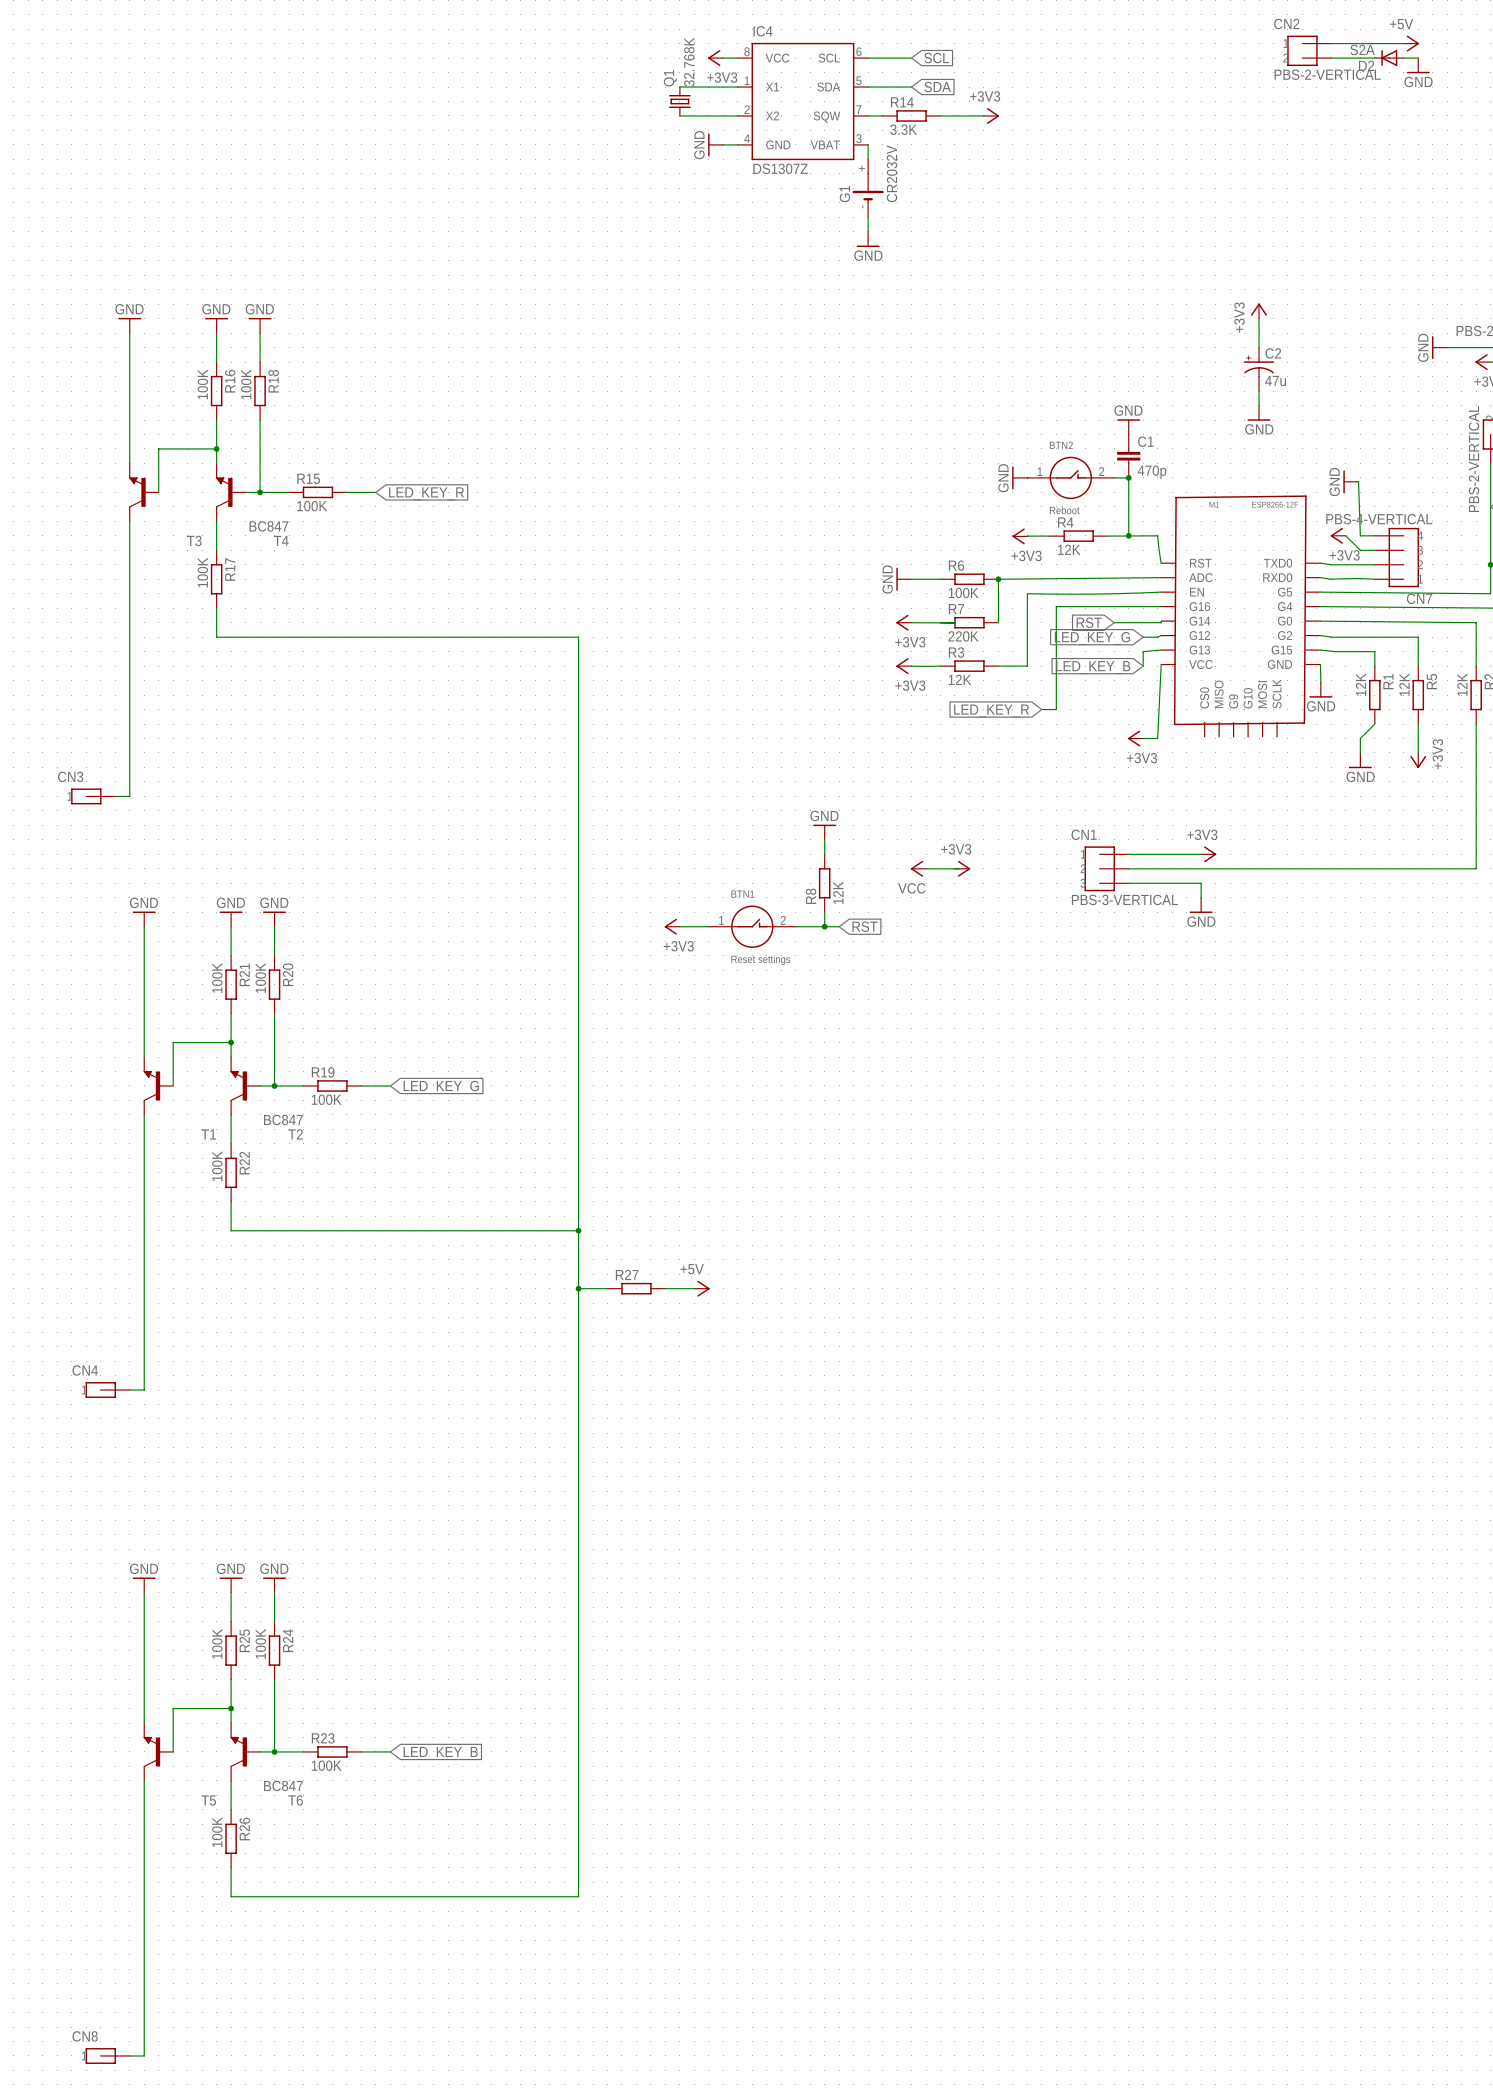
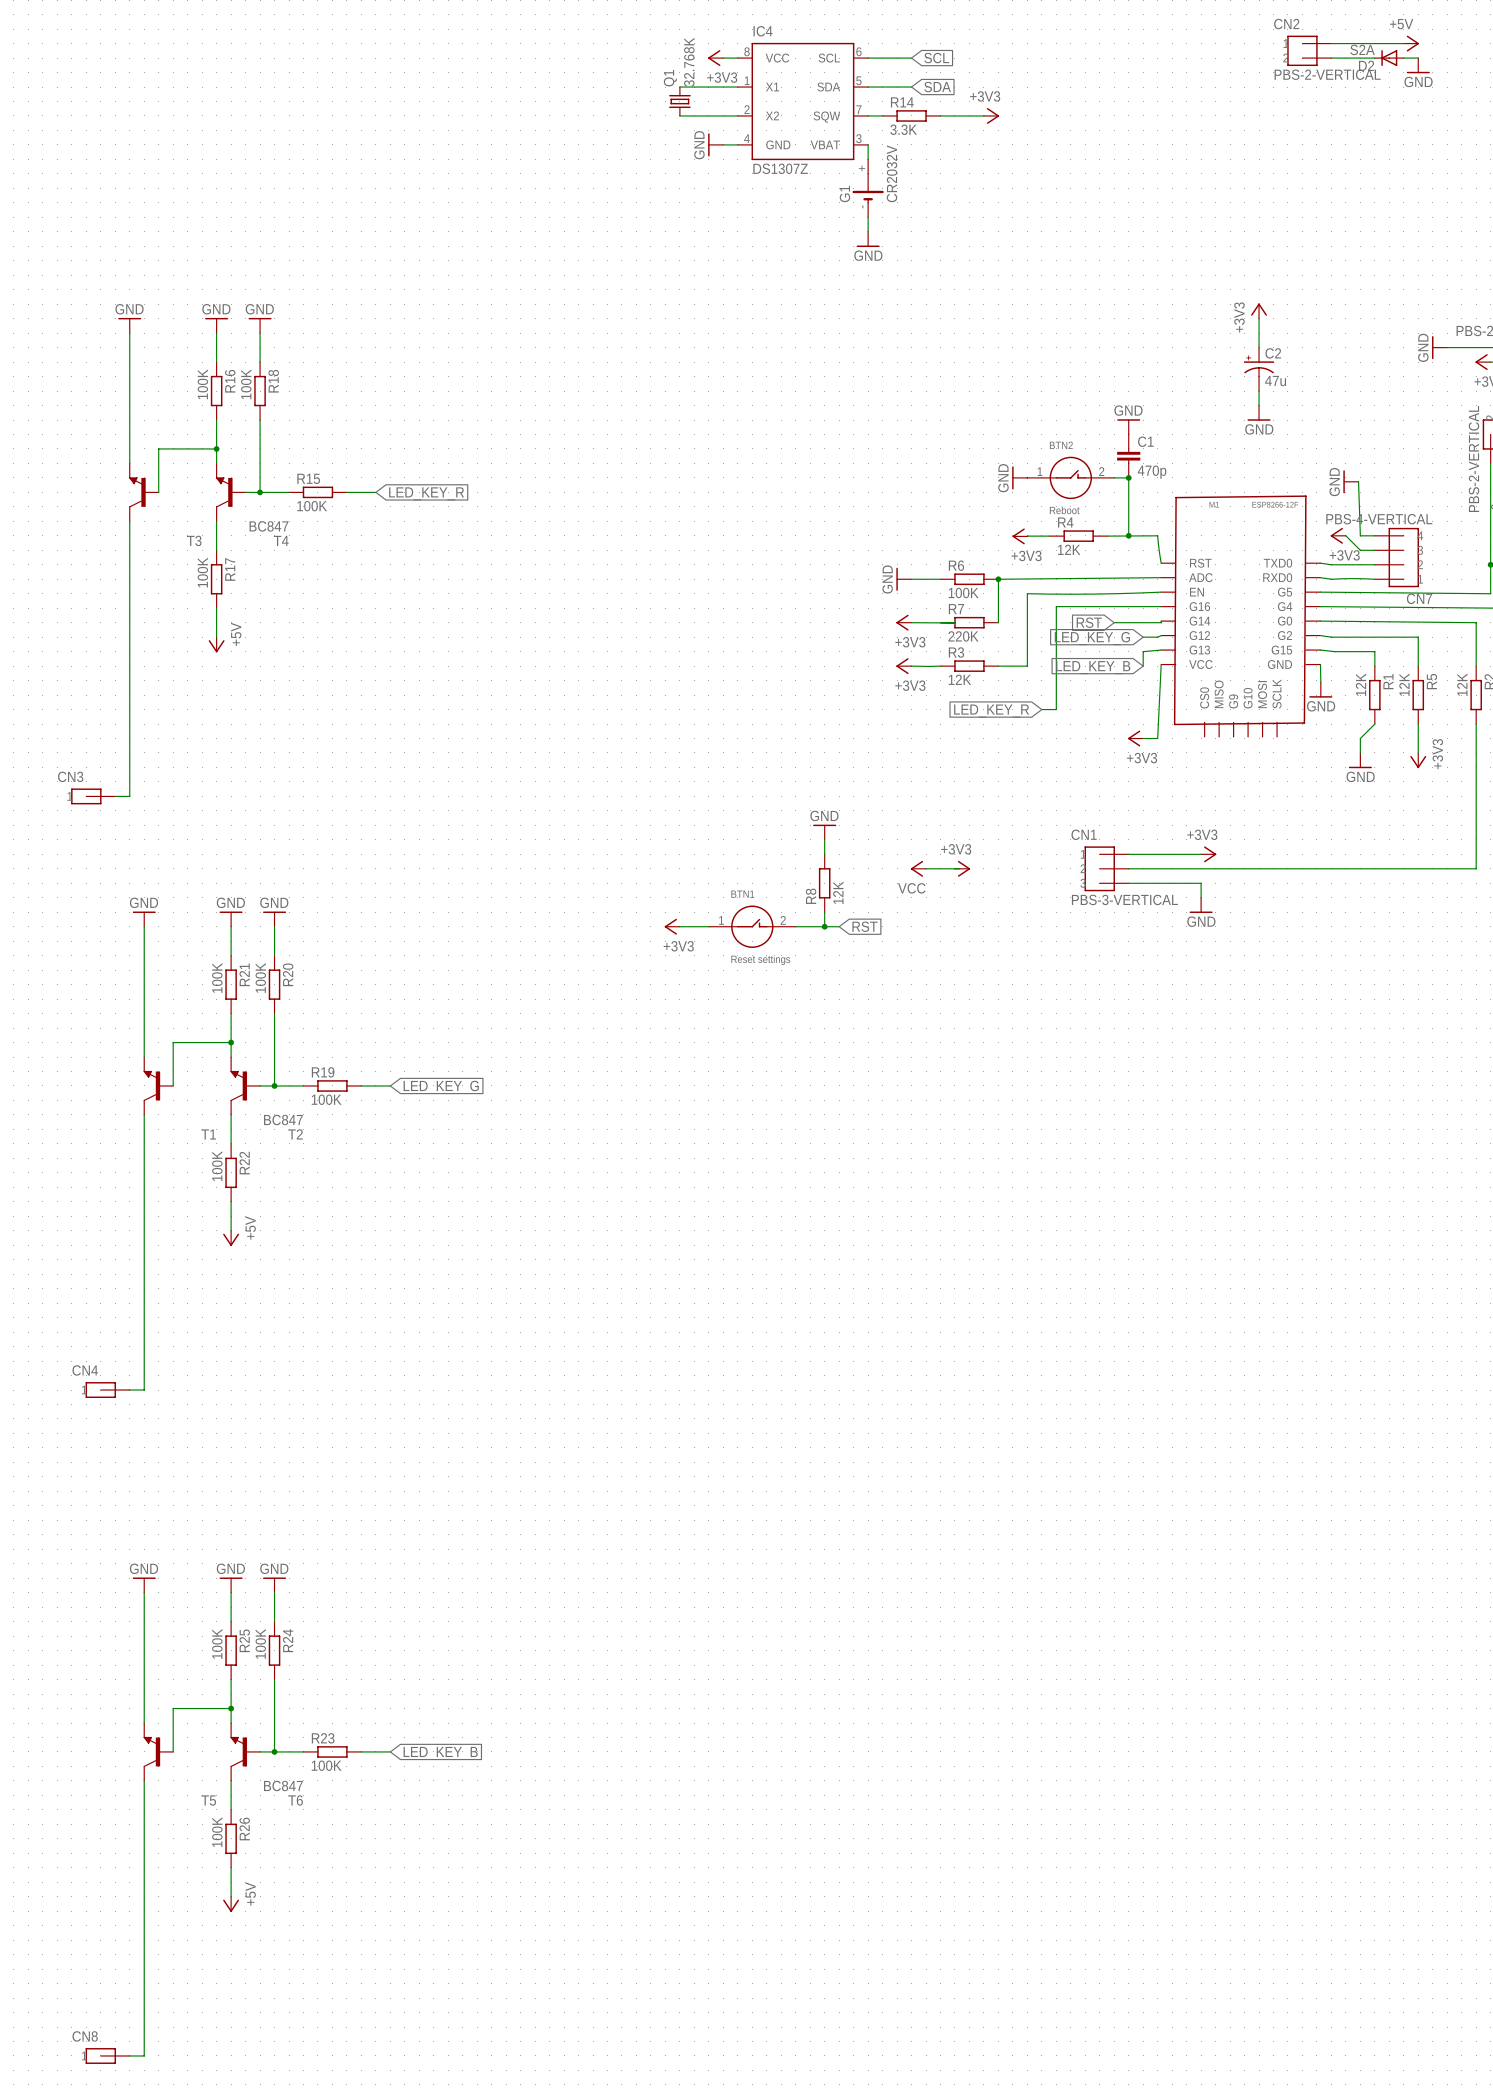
wire: (216, 637) (578, 637) (578, 1896) (231, 1896) -> none
power symbol: none -> +5V (216, 644)
wire: (231, 1230) (578, 1230) -> none
junction: (578, 1230) -> none
power symbol: none -> +5V (231, 1238)
wire: (578, 1288) (607, 1288) -> none
junction: (578, 1288) -> none
R27: (636, 1288) -> none
wire: (665, 1288) (694, 1288) -> none
power symbol: +5V (701, 1288) -> none
power symbol: none -> +5V (231, 1904)

